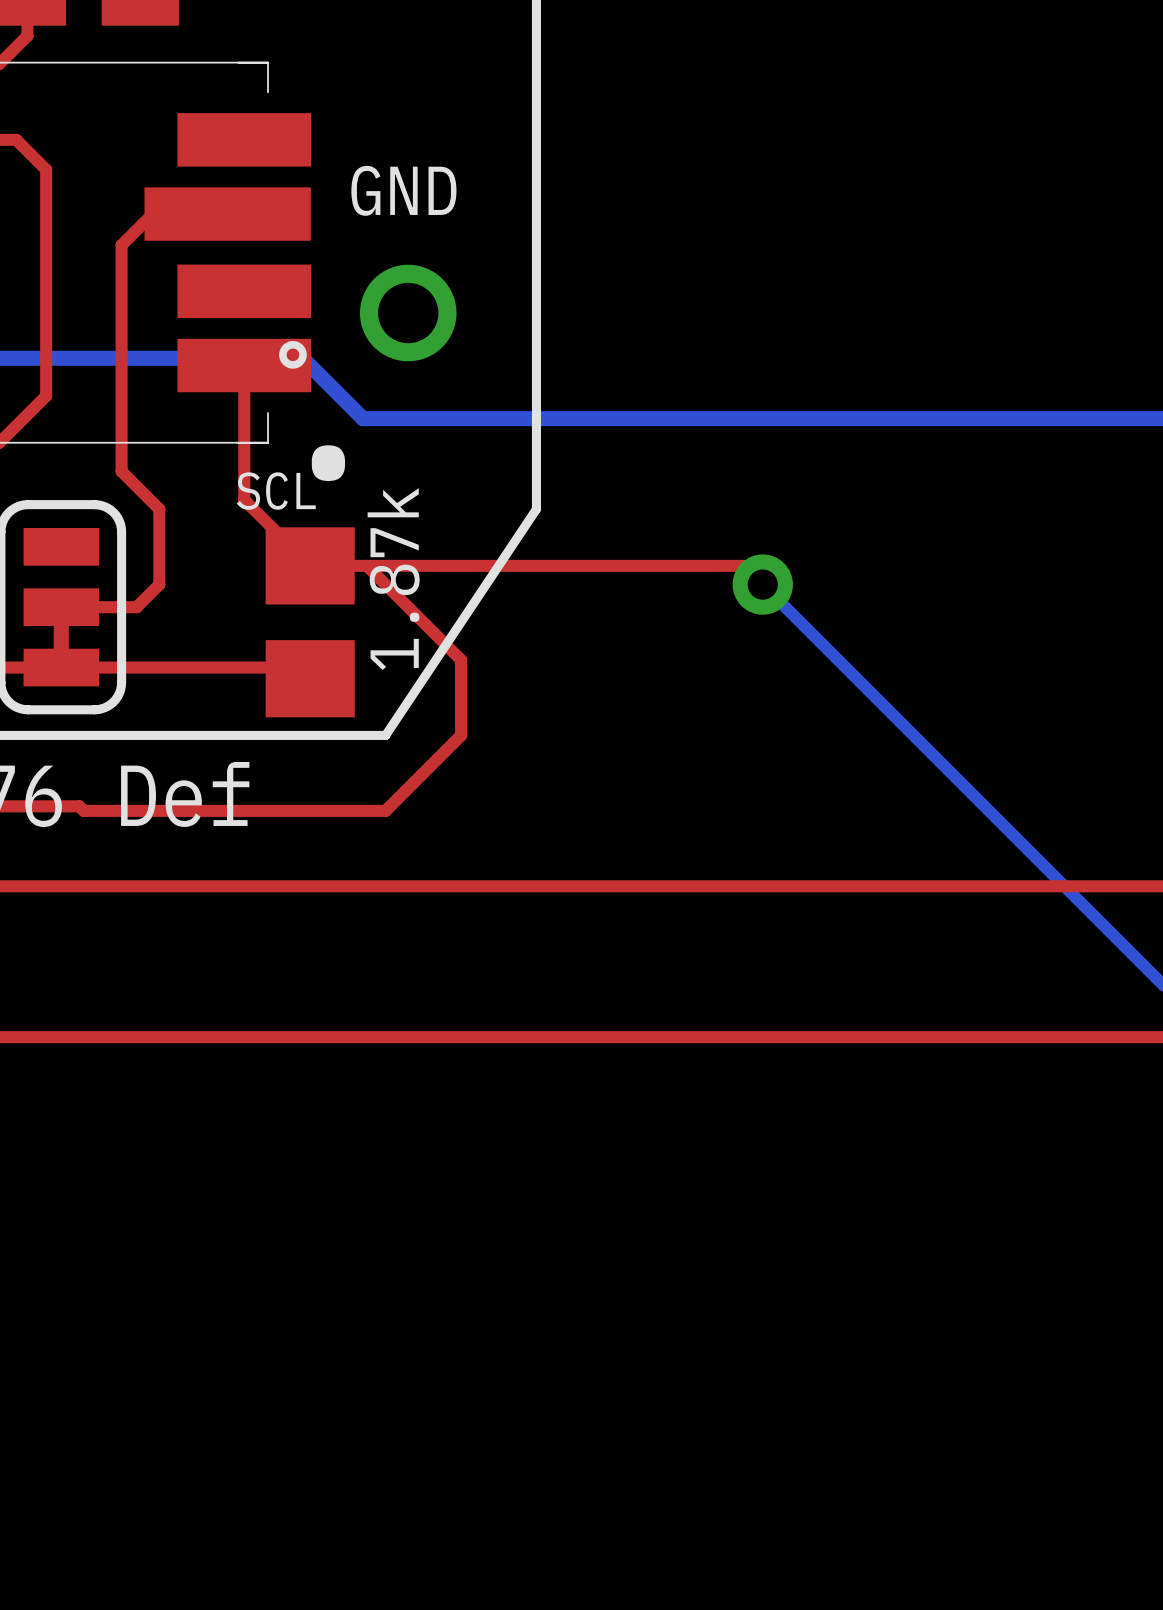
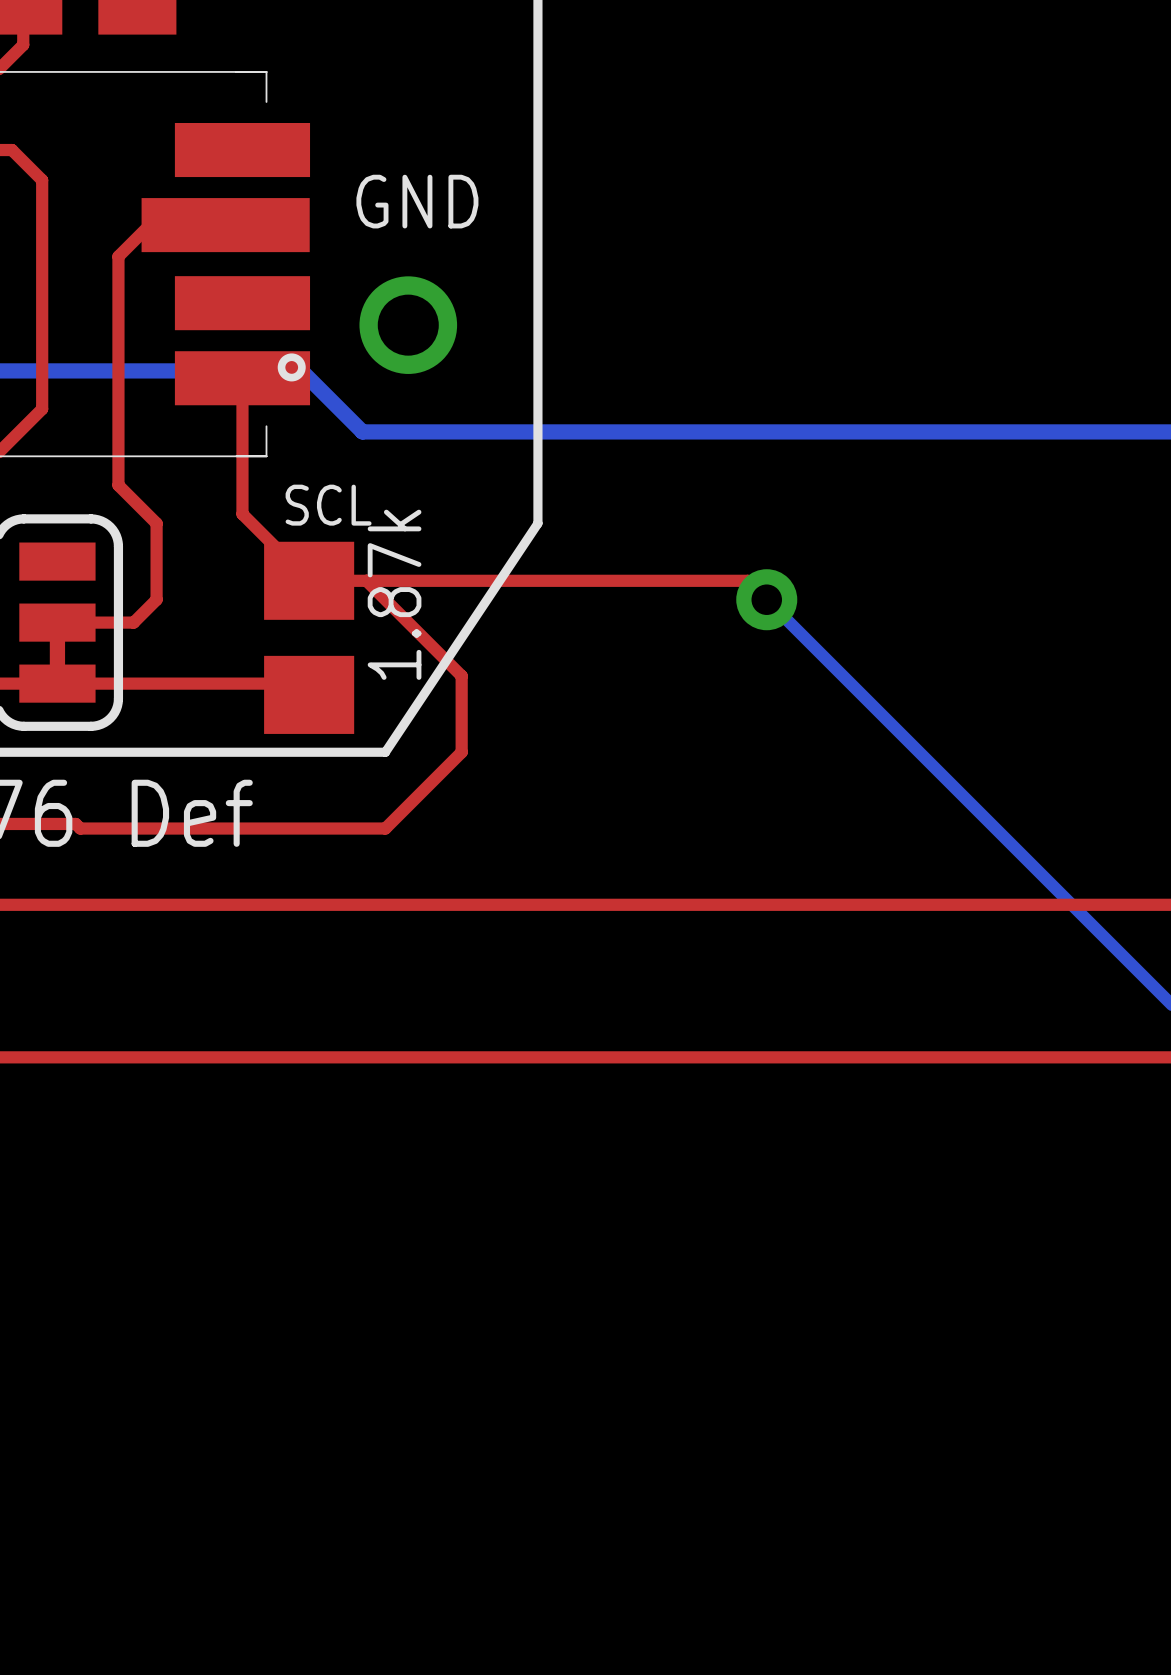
text: • (328, 463) -> none
text position: SCL (276, 491) -> SCL (328, 505)

